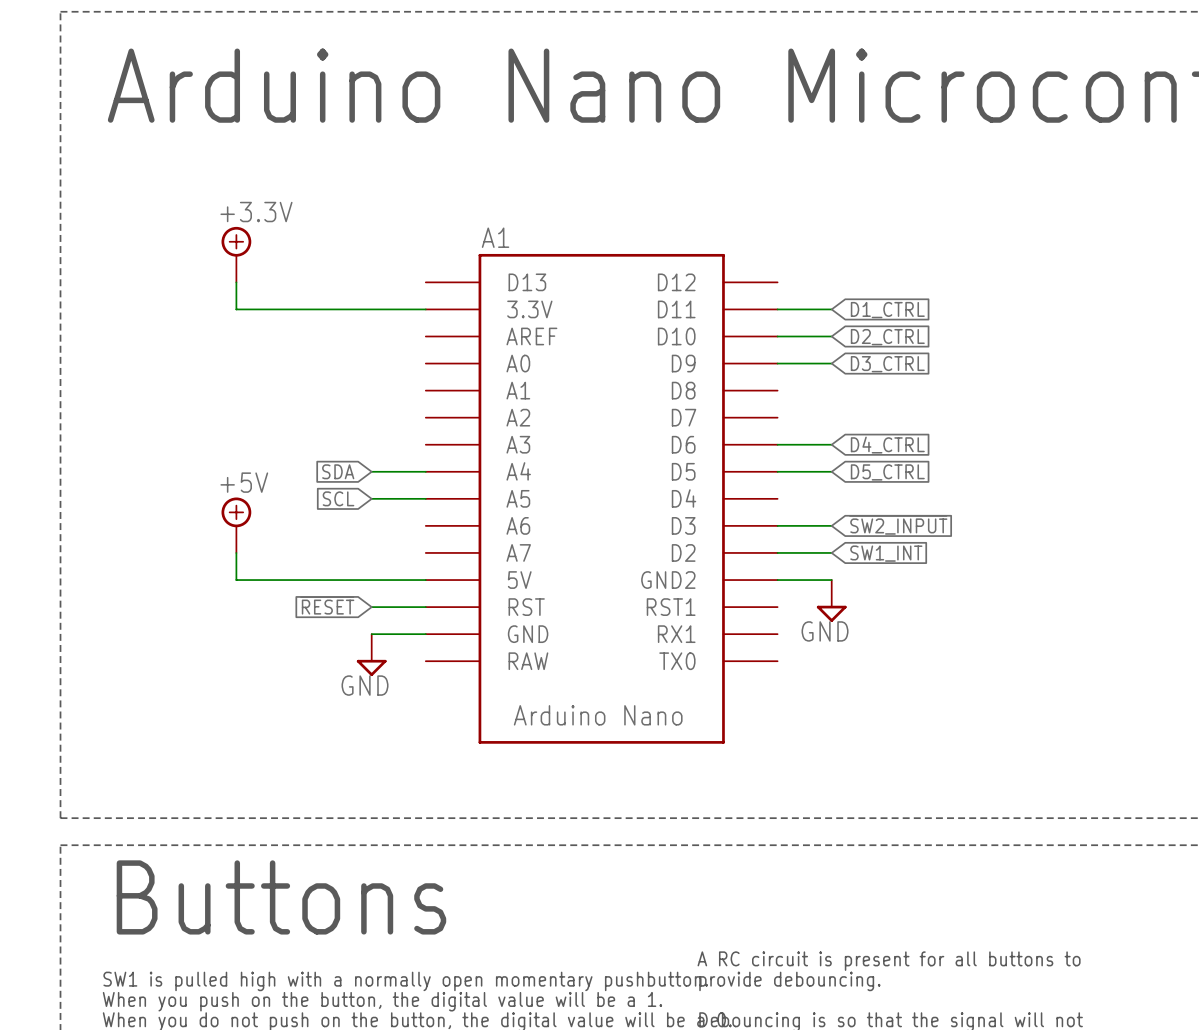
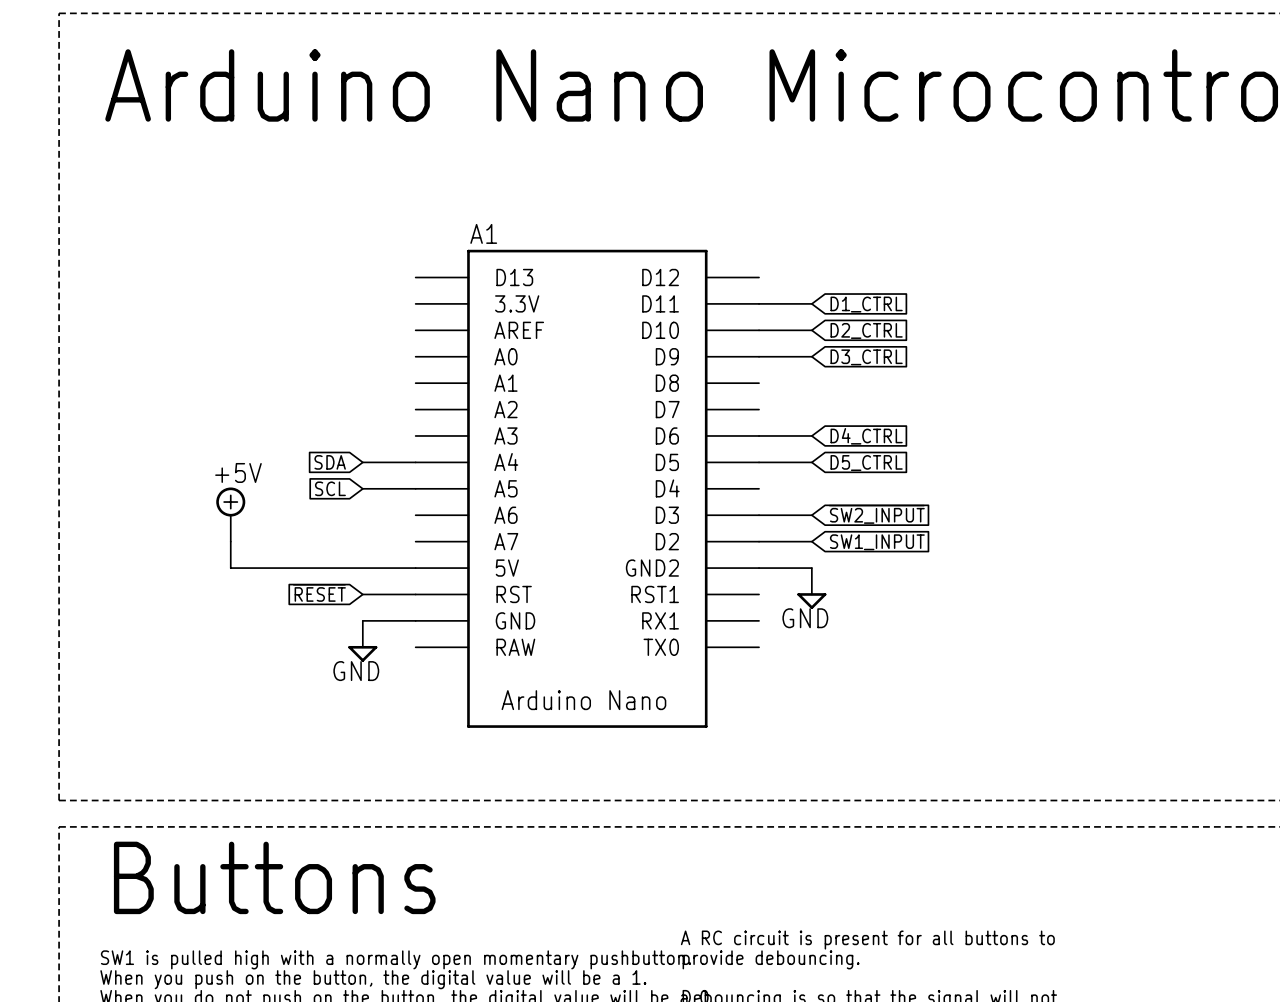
power symbol: +3.3V (236, 254) -> none
wire: (236, 282) (236, 309) (425, 309) -> none
global label: SW1_INT (886, 553) -> SW1_INPUT (877, 542)

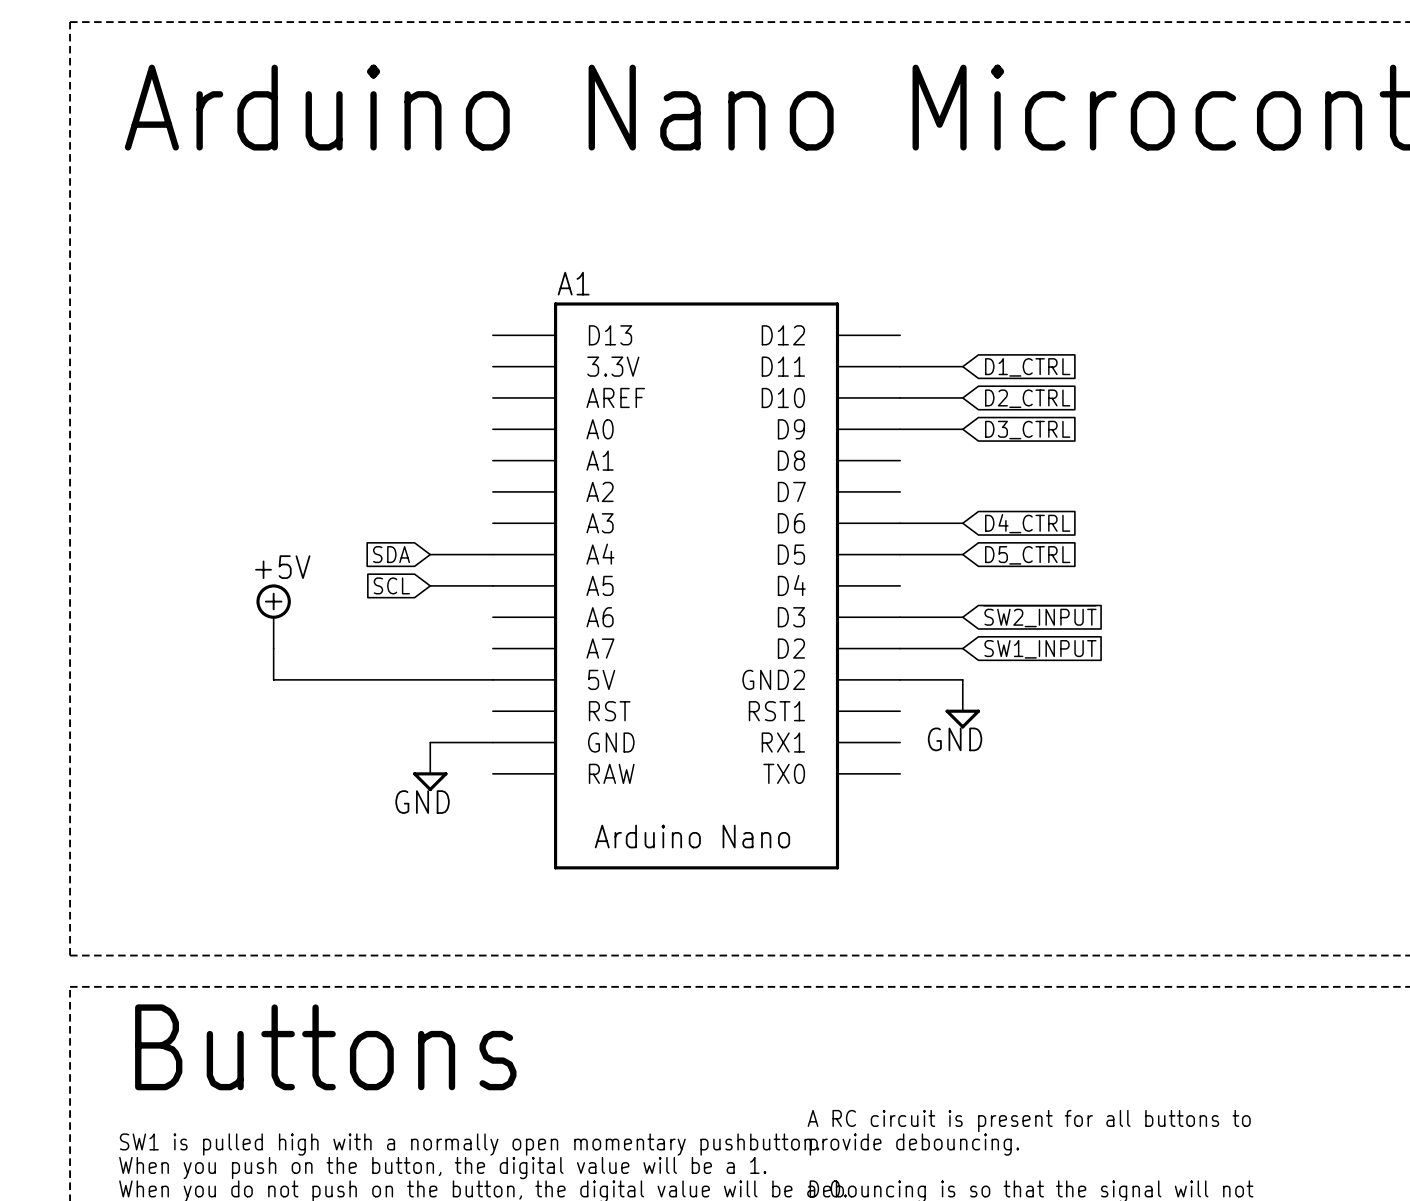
global label: ~{RESET} (319, 592) -> none
wire: (362, 594) (415, 594) -> none

